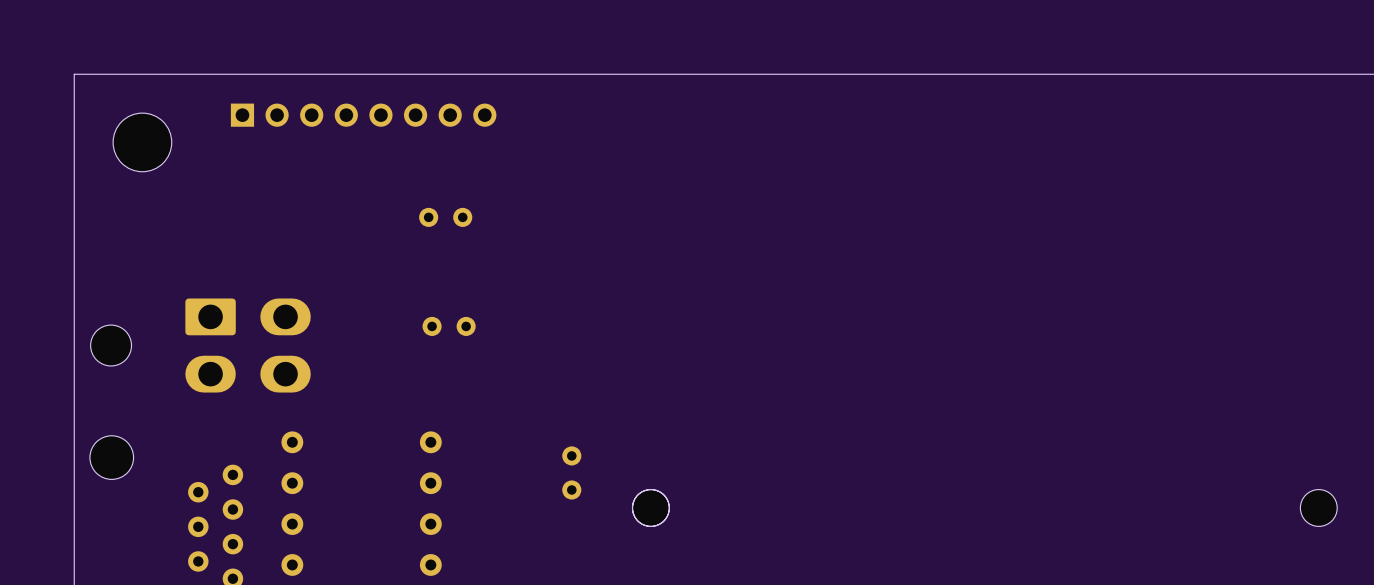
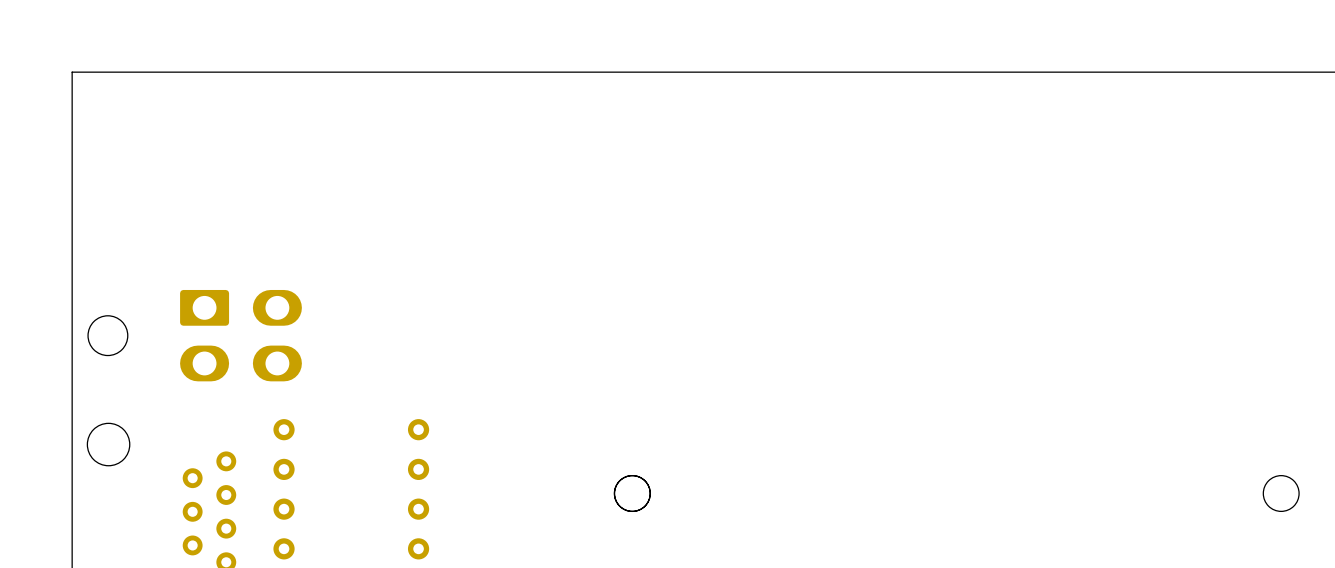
part: (363, 115) -> none
part: (142, 142) -> none
part: (445, 217) -> none
part: (449, 326) -> none
part: (571, 472) -> none

